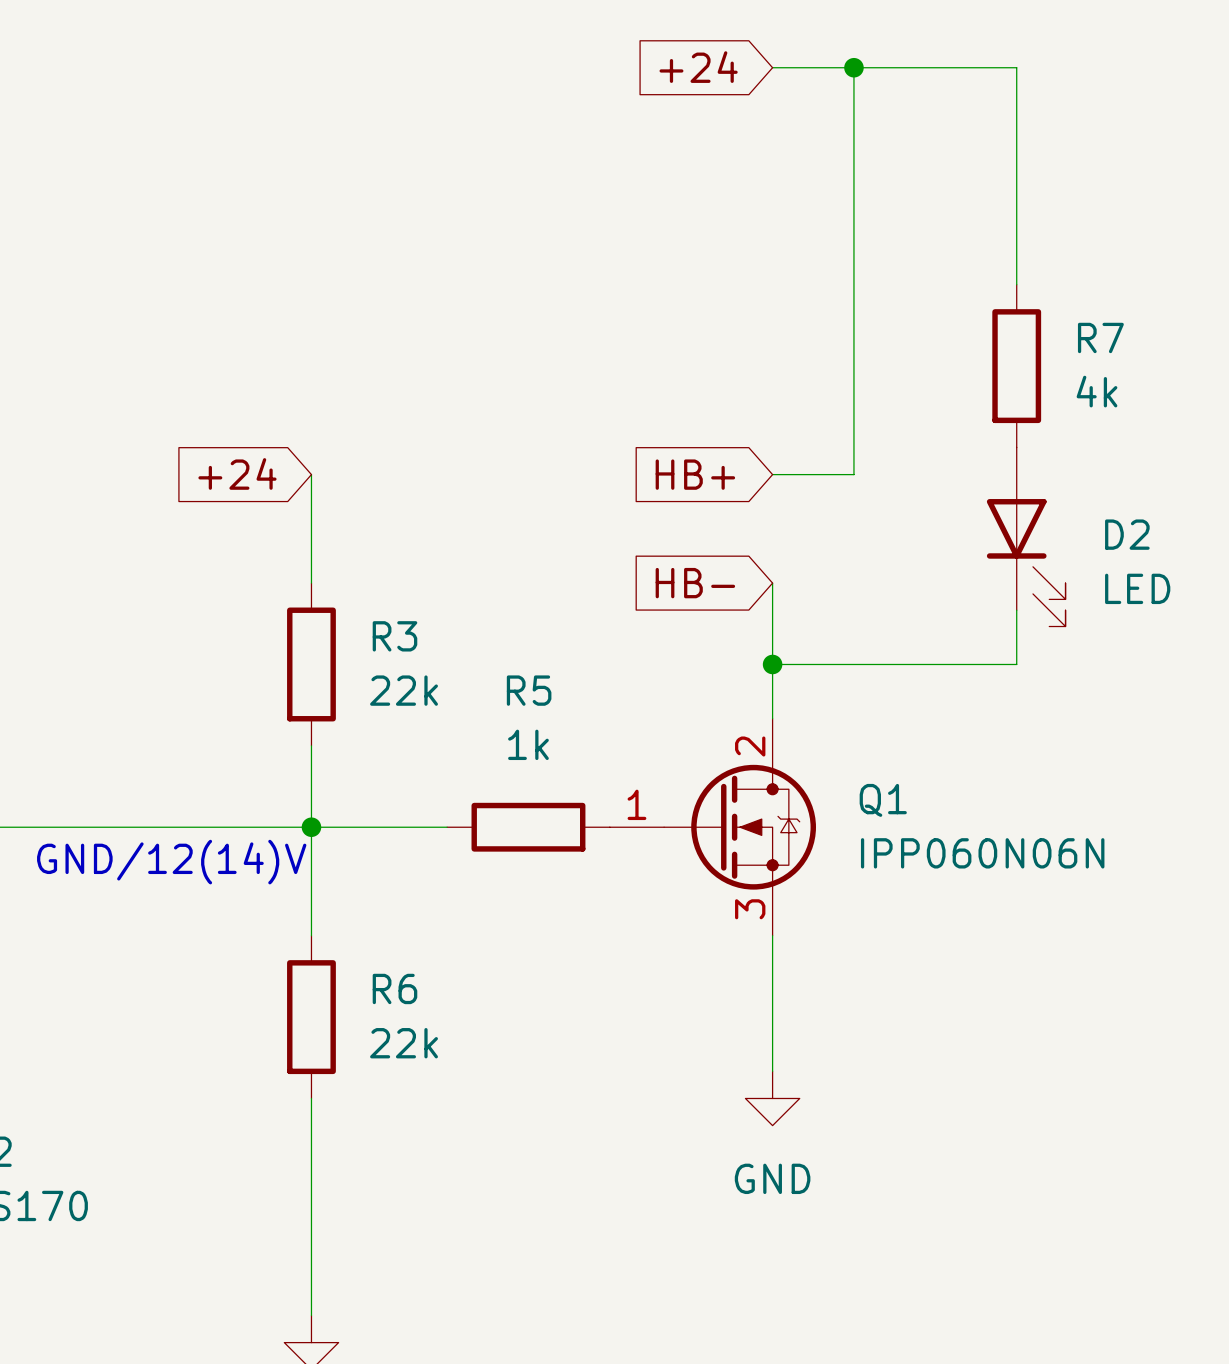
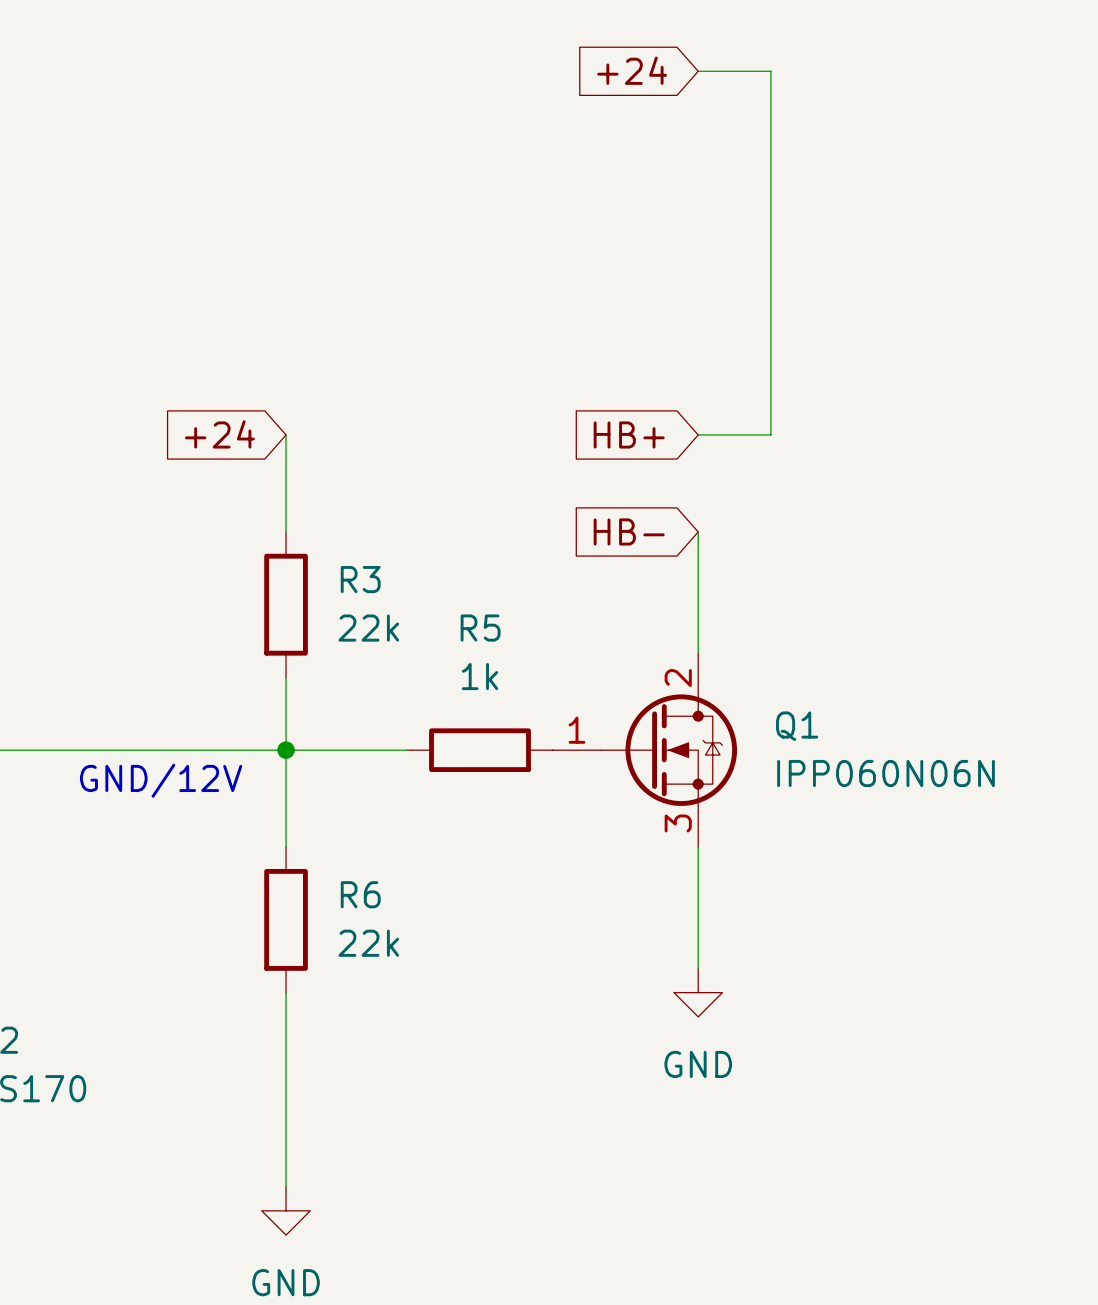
wire: (853, 67) (1016, 67) (1016, 284) -> none
junction: (853, 67) -> none
R7: 4k (1016, 366) -> none
D2: LED (1026, 536) -> none
wire: (1016, 610) (1016, 664) (772, 664) -> none
junction: (772, 664) -> none
text: GND/12(14)V (171, 862) -> GND/12V (161, 780)

